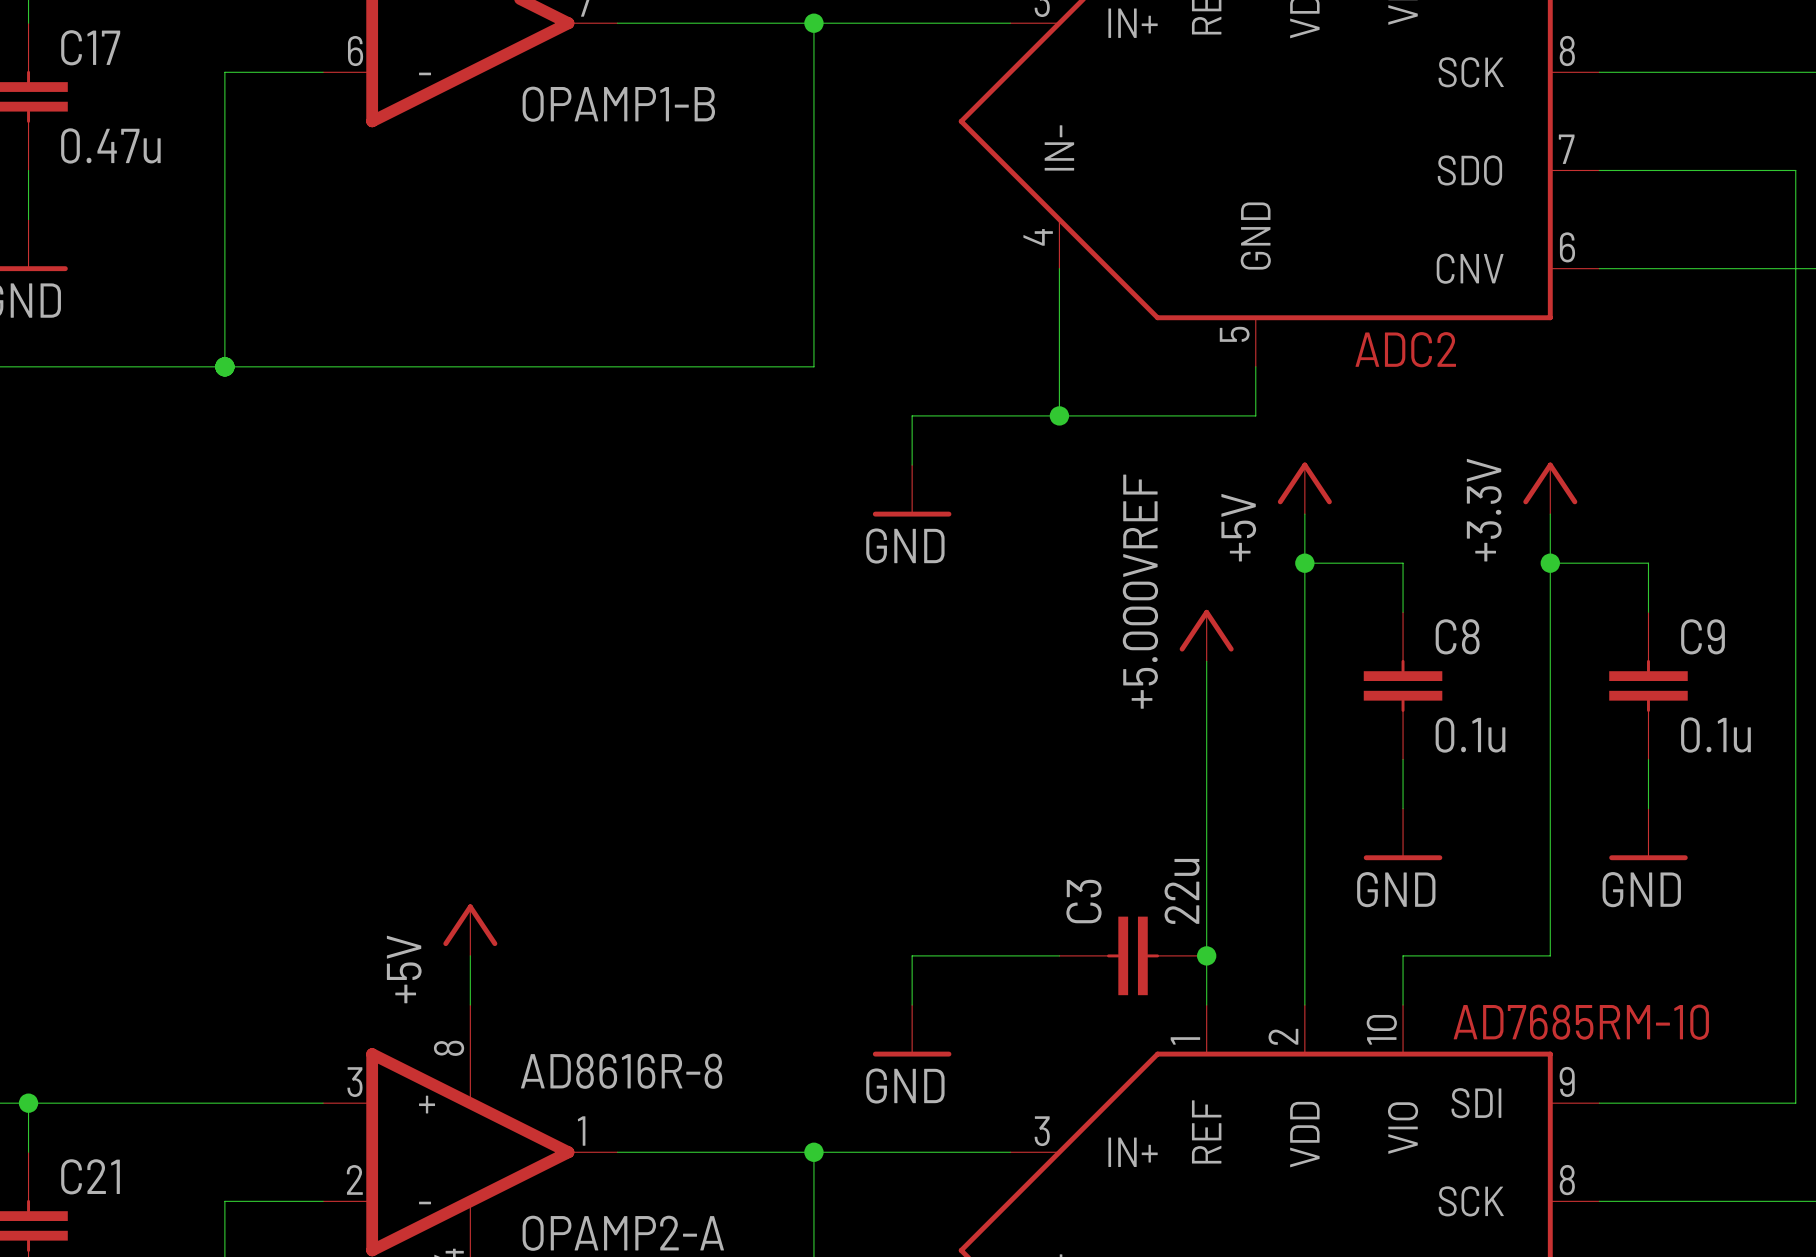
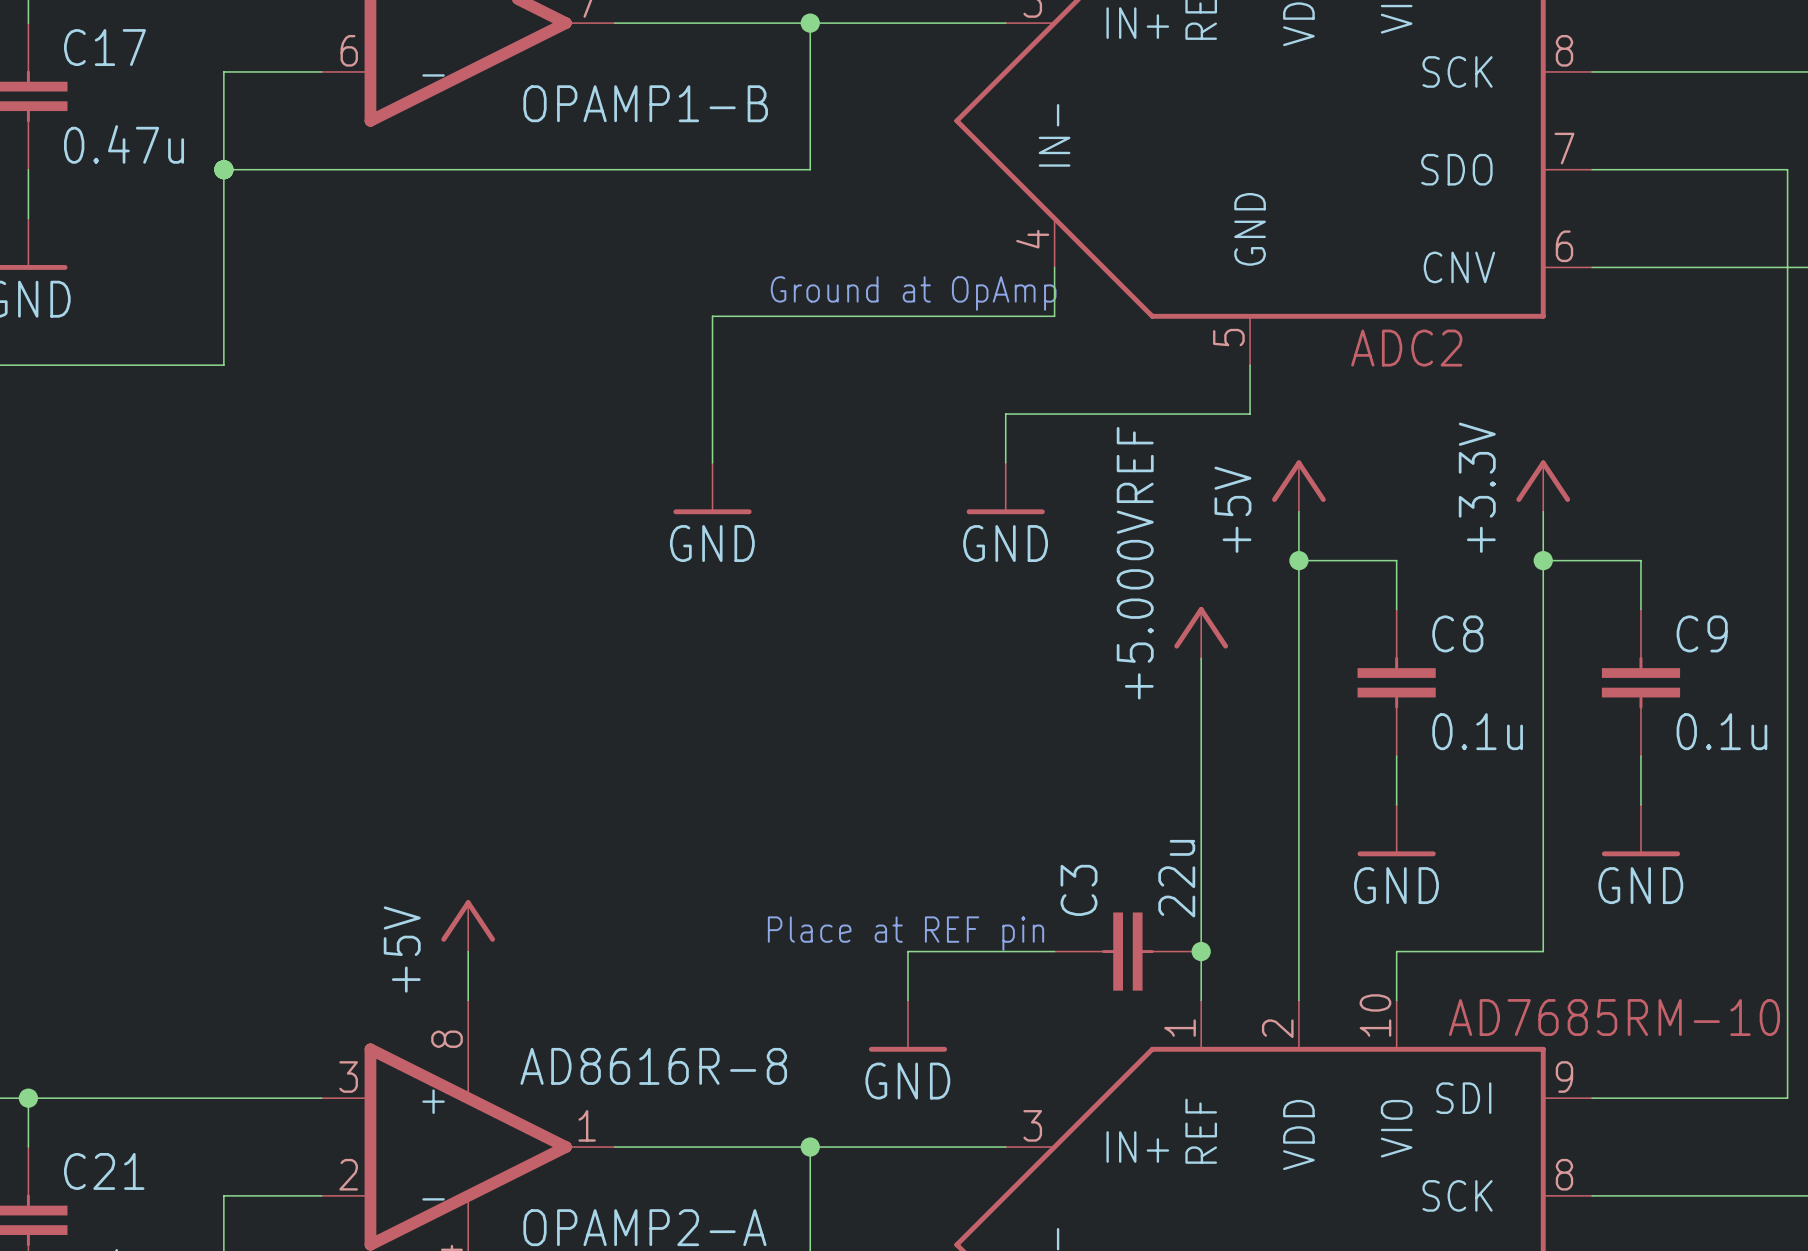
junction: none -> (223, 169)
wire: (813, 170) (813, 366) (224, 366) -> (810, 169) (223, 169)
text: none -> Ground at OpAmp (913, 293)
wire: (1059, 317) (1059, 415) -> (1054, 316) (712, 316) (712, 462)
junction: (224, 366) -> none
wire: (1010, 415) (912, 415) (912, 465) -> (1005, 414) (1005, 462)
junction: (1059, 415) -> none
power symbol: none -> GND (712, 488)
power symbol: GND (912, 490) -> none
power symbol: none -> GND (1005, 488)
text: none -> Place at REF pin (906, 933)

